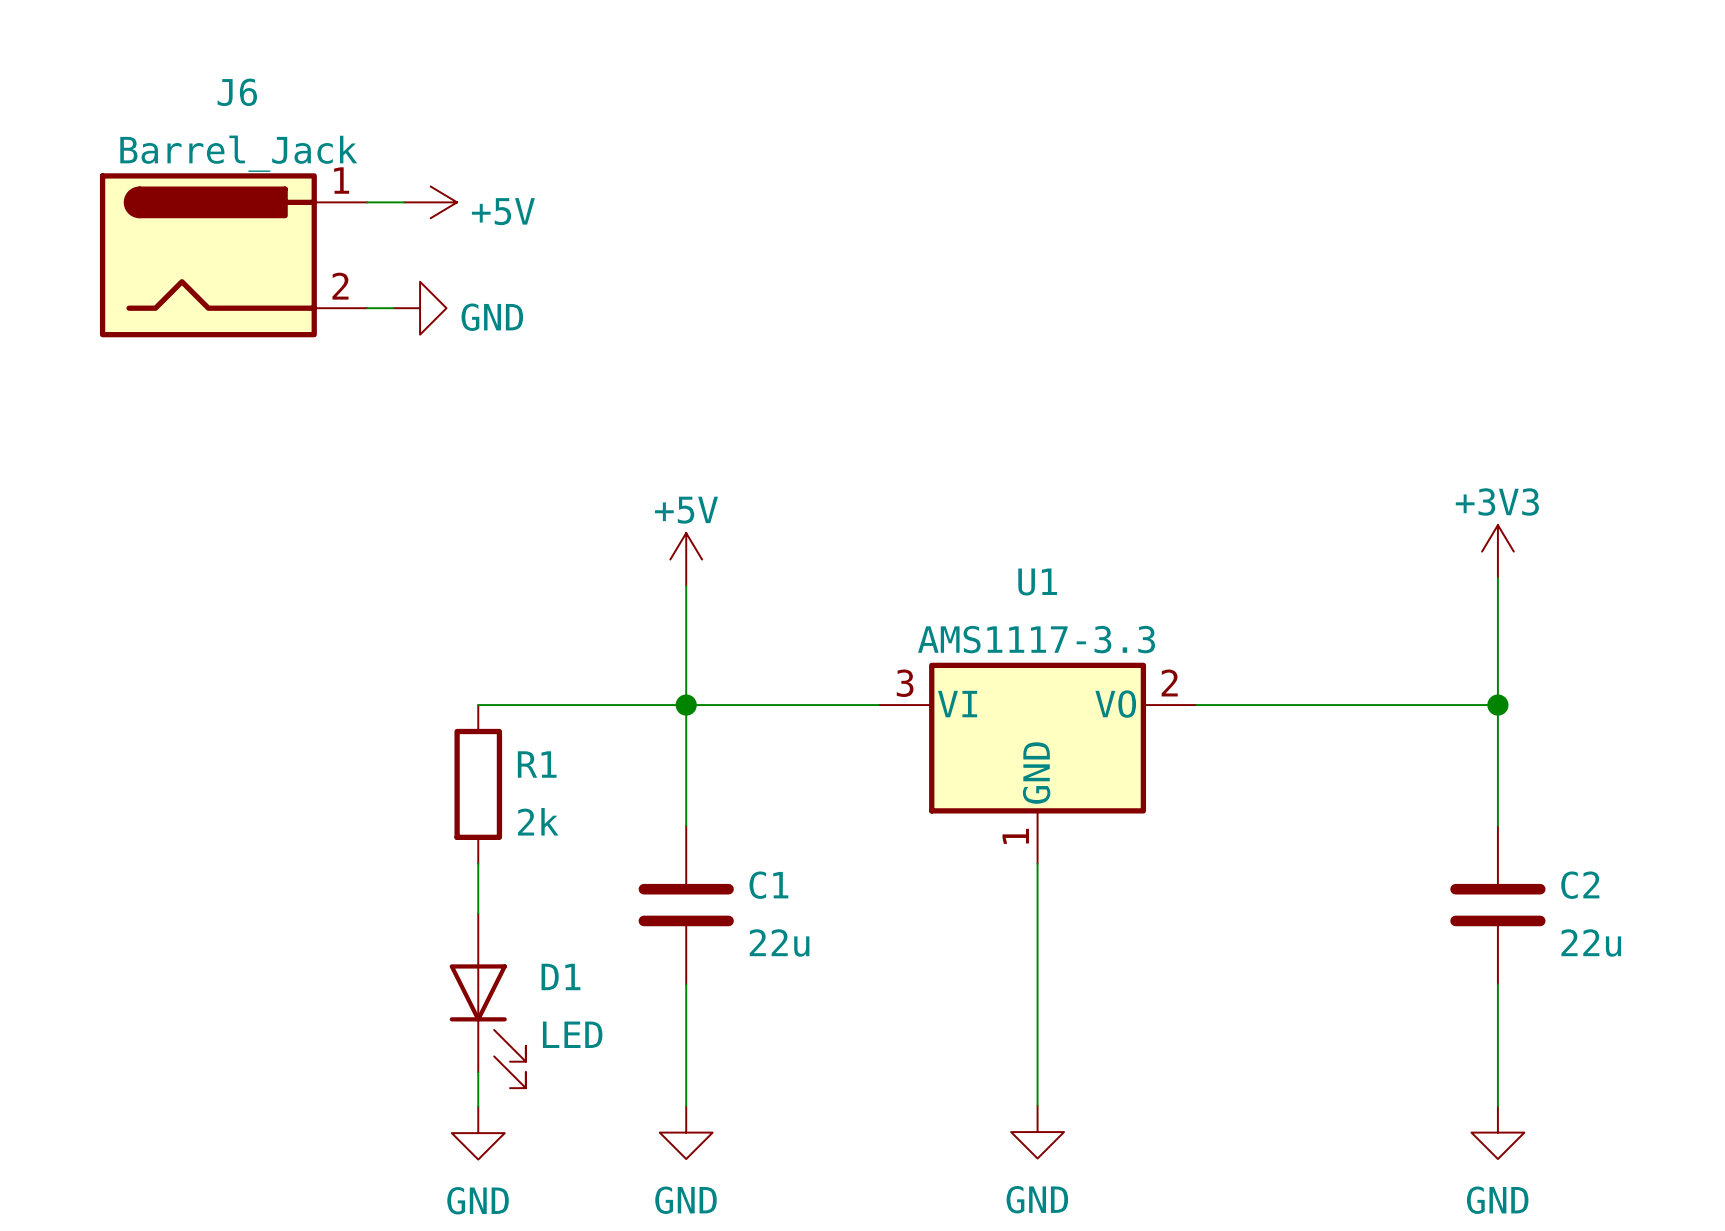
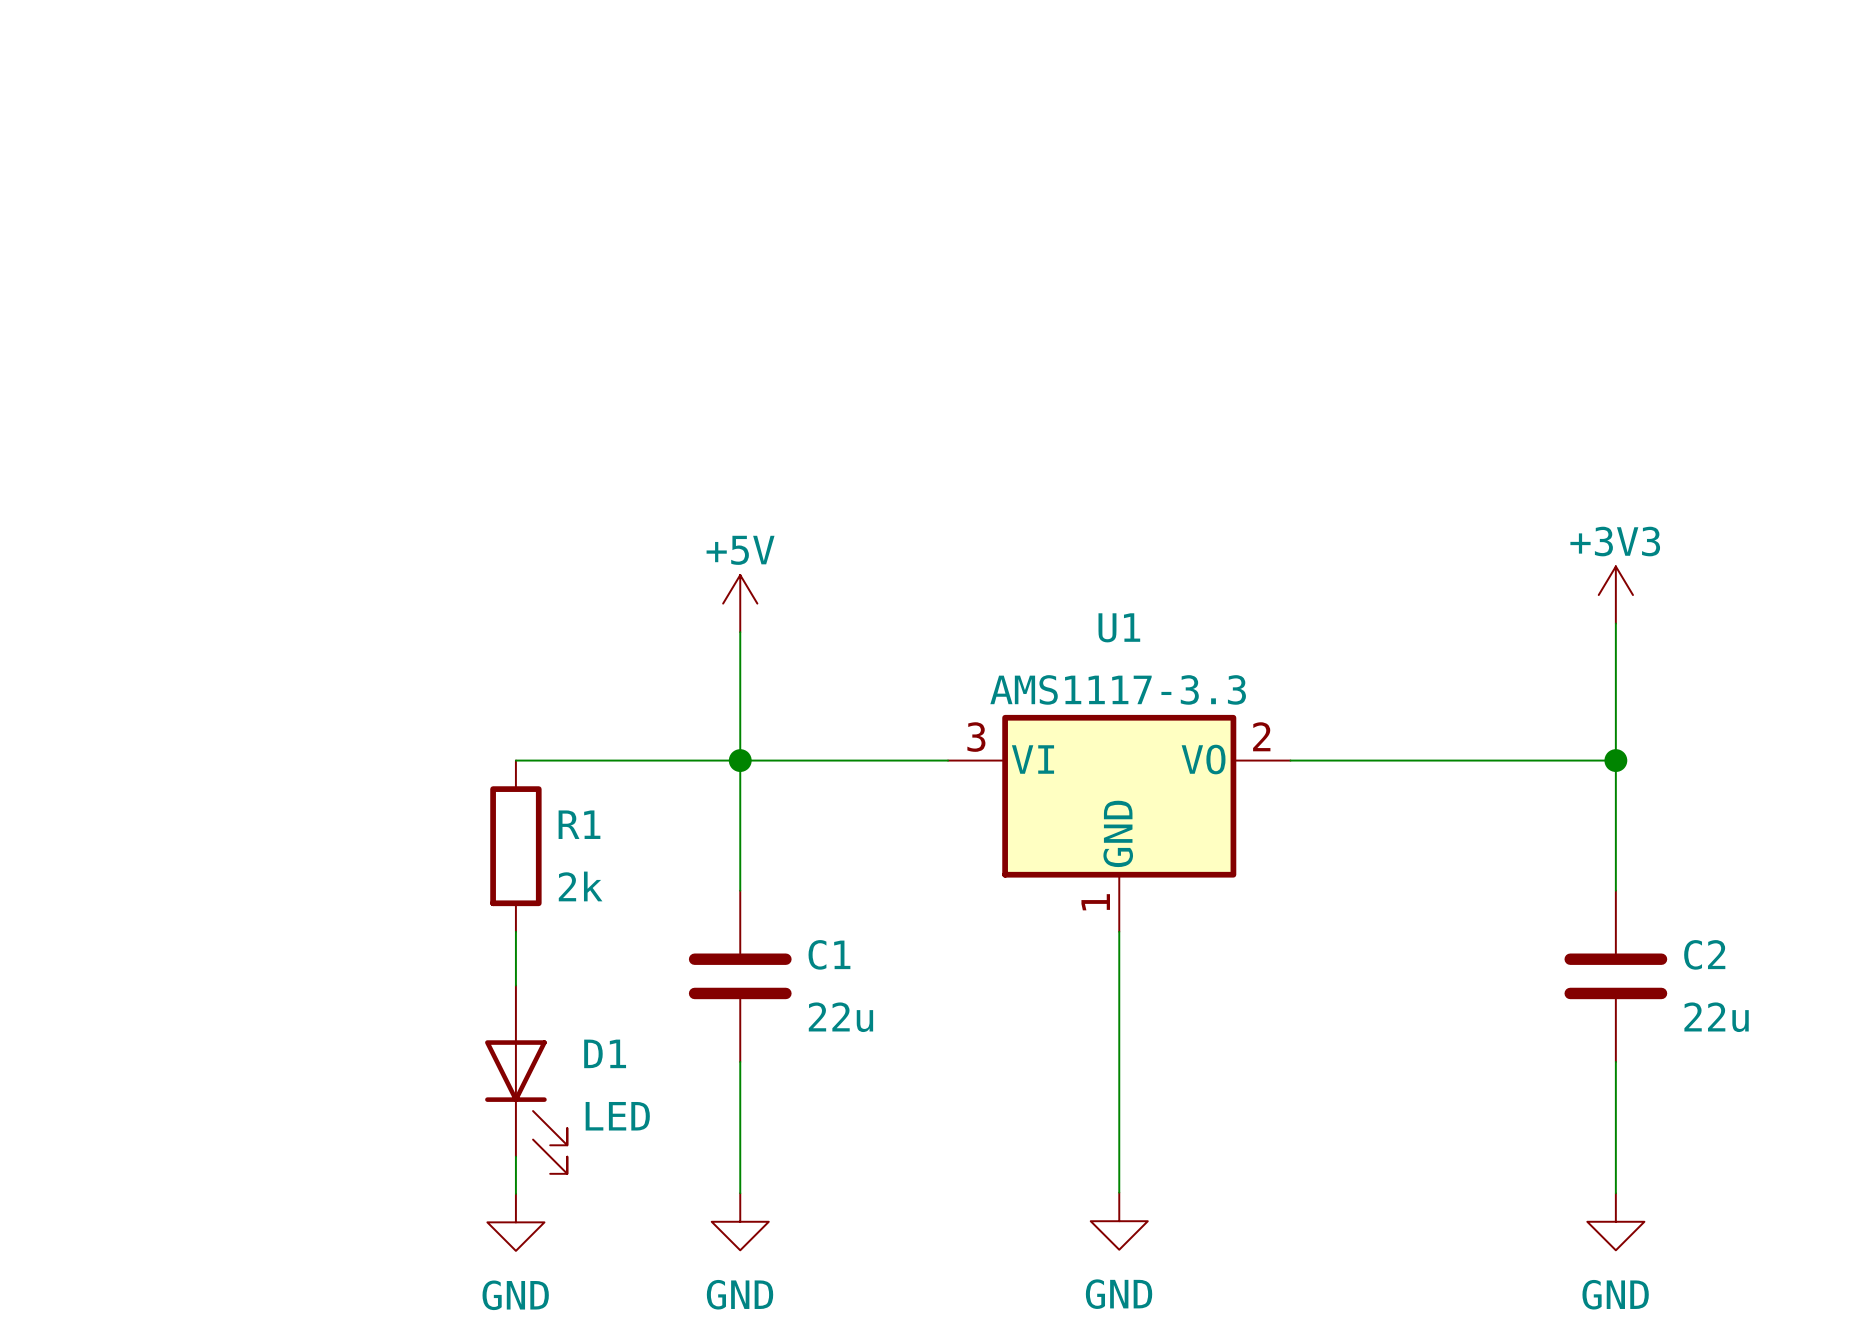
wire: (367, 202) (404, 202) -> none
power symbol: +5V (430, 202) -> none
J6: Barrel_Jack (233, 255) -> none
wire: (367, 308) (393, 308) -> none
power symbol: GND (420, 308) -> none

